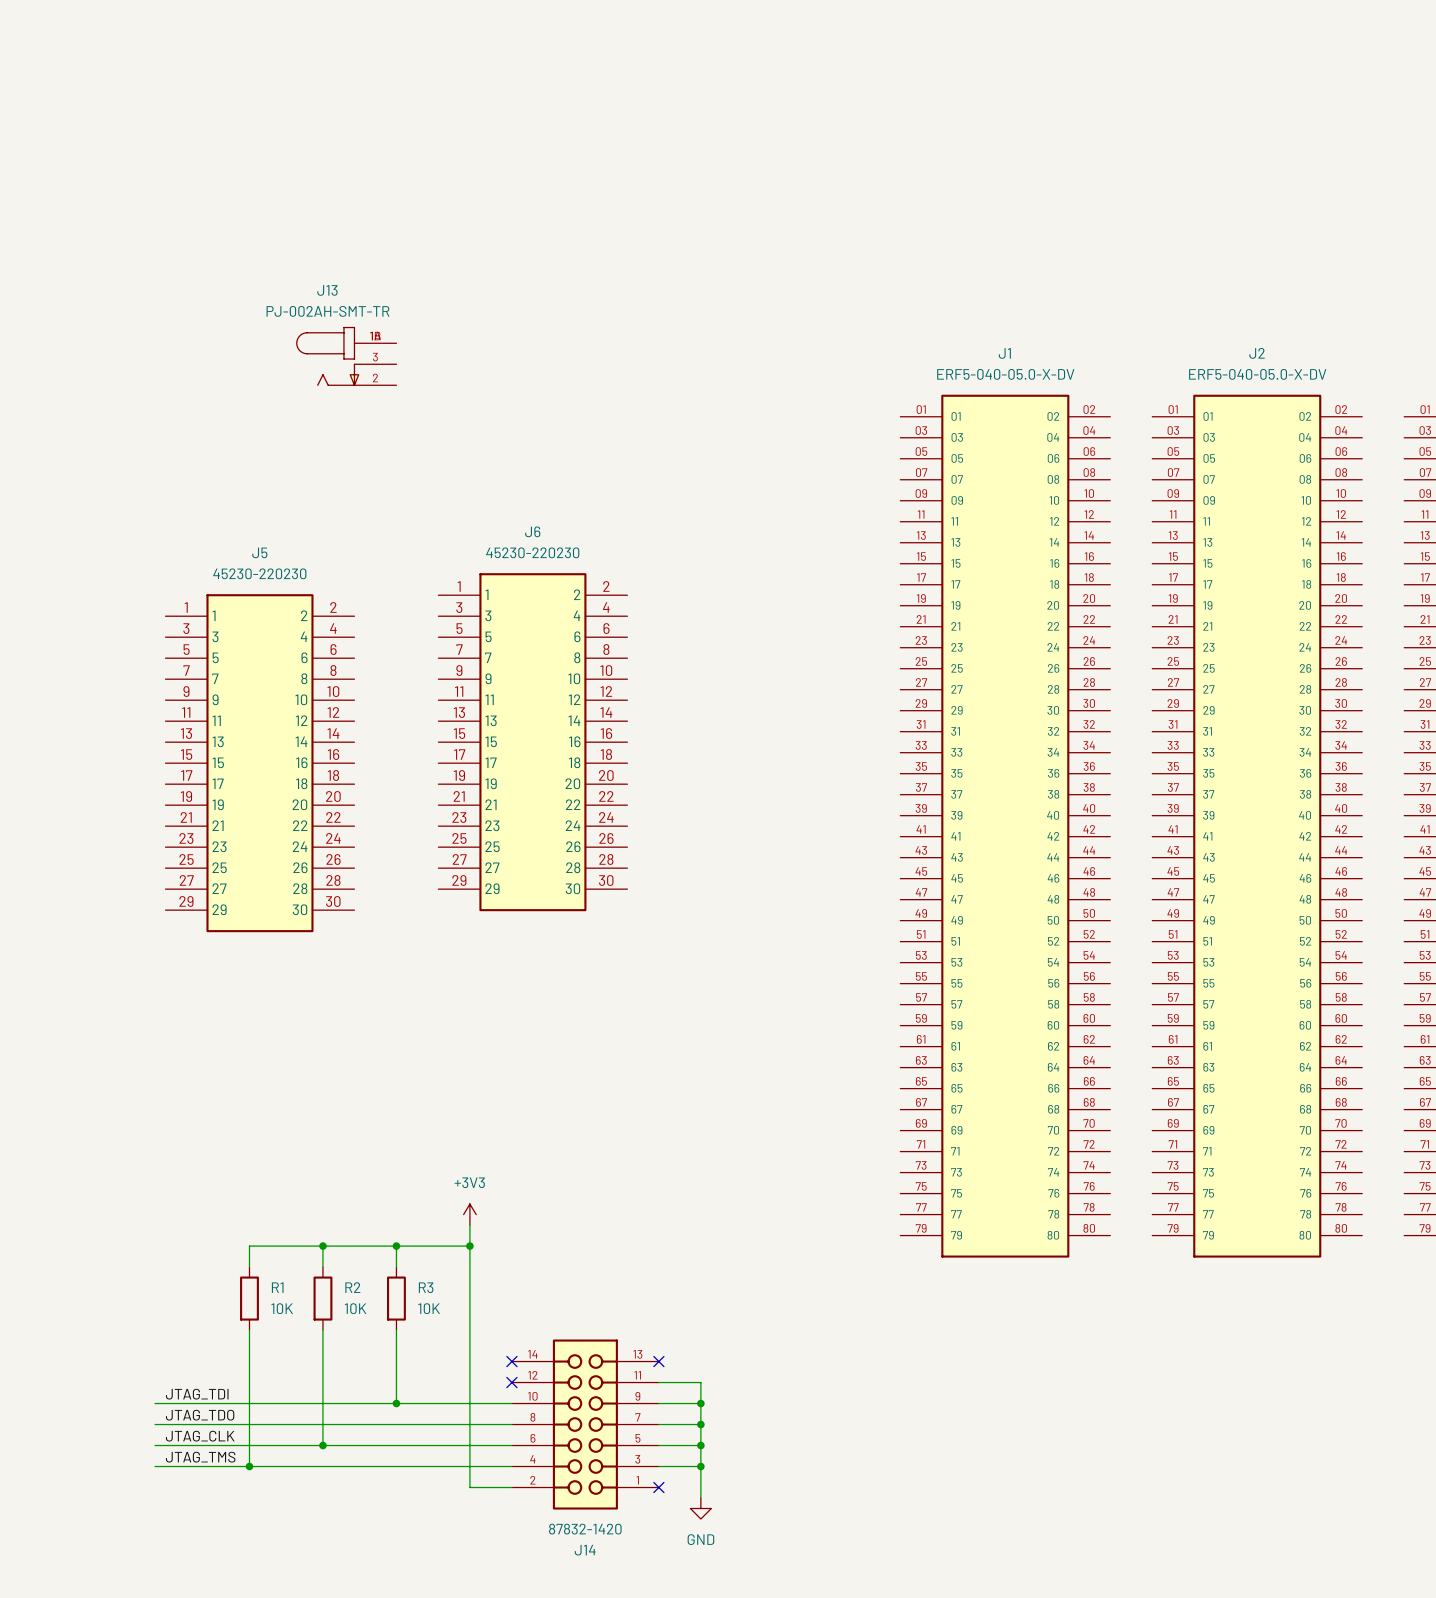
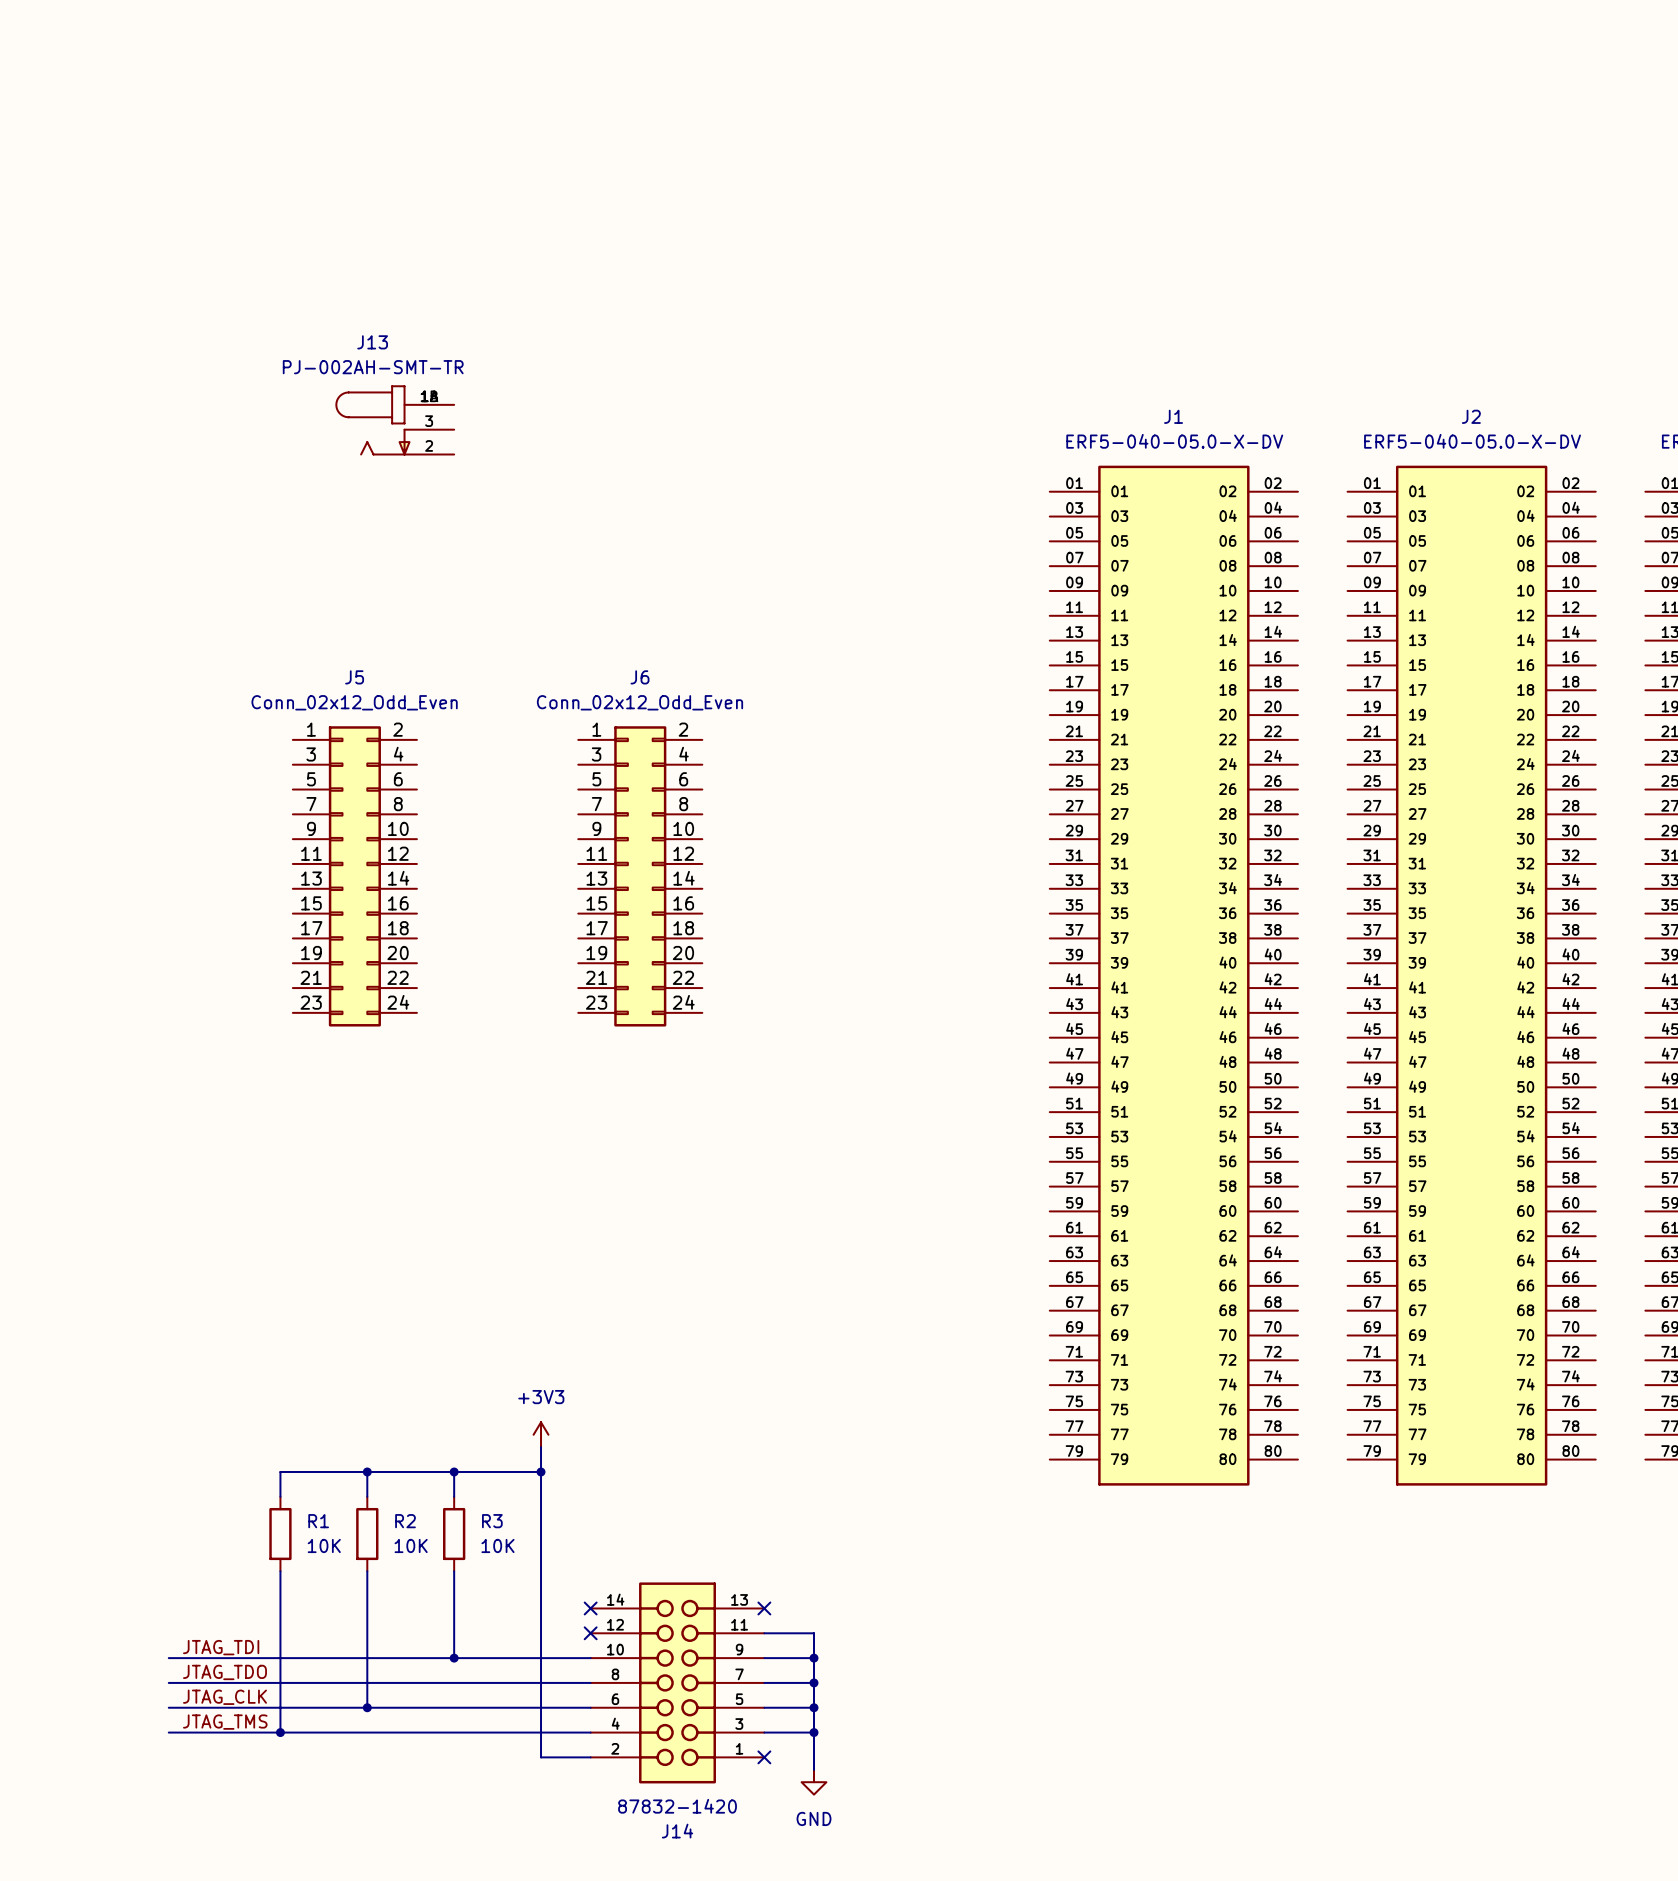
J6 name position: J6 (532, 531) -> J6 (639, 677)
J5 name position: J5 (259, 552) -> J5 (354, 677)
J6 value: 45230-220230 (532, 552) -> Conn_02x12_Odd_Even (639, 702)
J5 value: 45230-220230 (259, 573) -> Conn_02x12_Odd_Even (354, 702)
J6 symbol: [438, 573, 628, 912] -> [578, 726, 703, 1027]
J5 symbol: [165, 594, 355, 933] -> [292, 726, 417, 1027]

